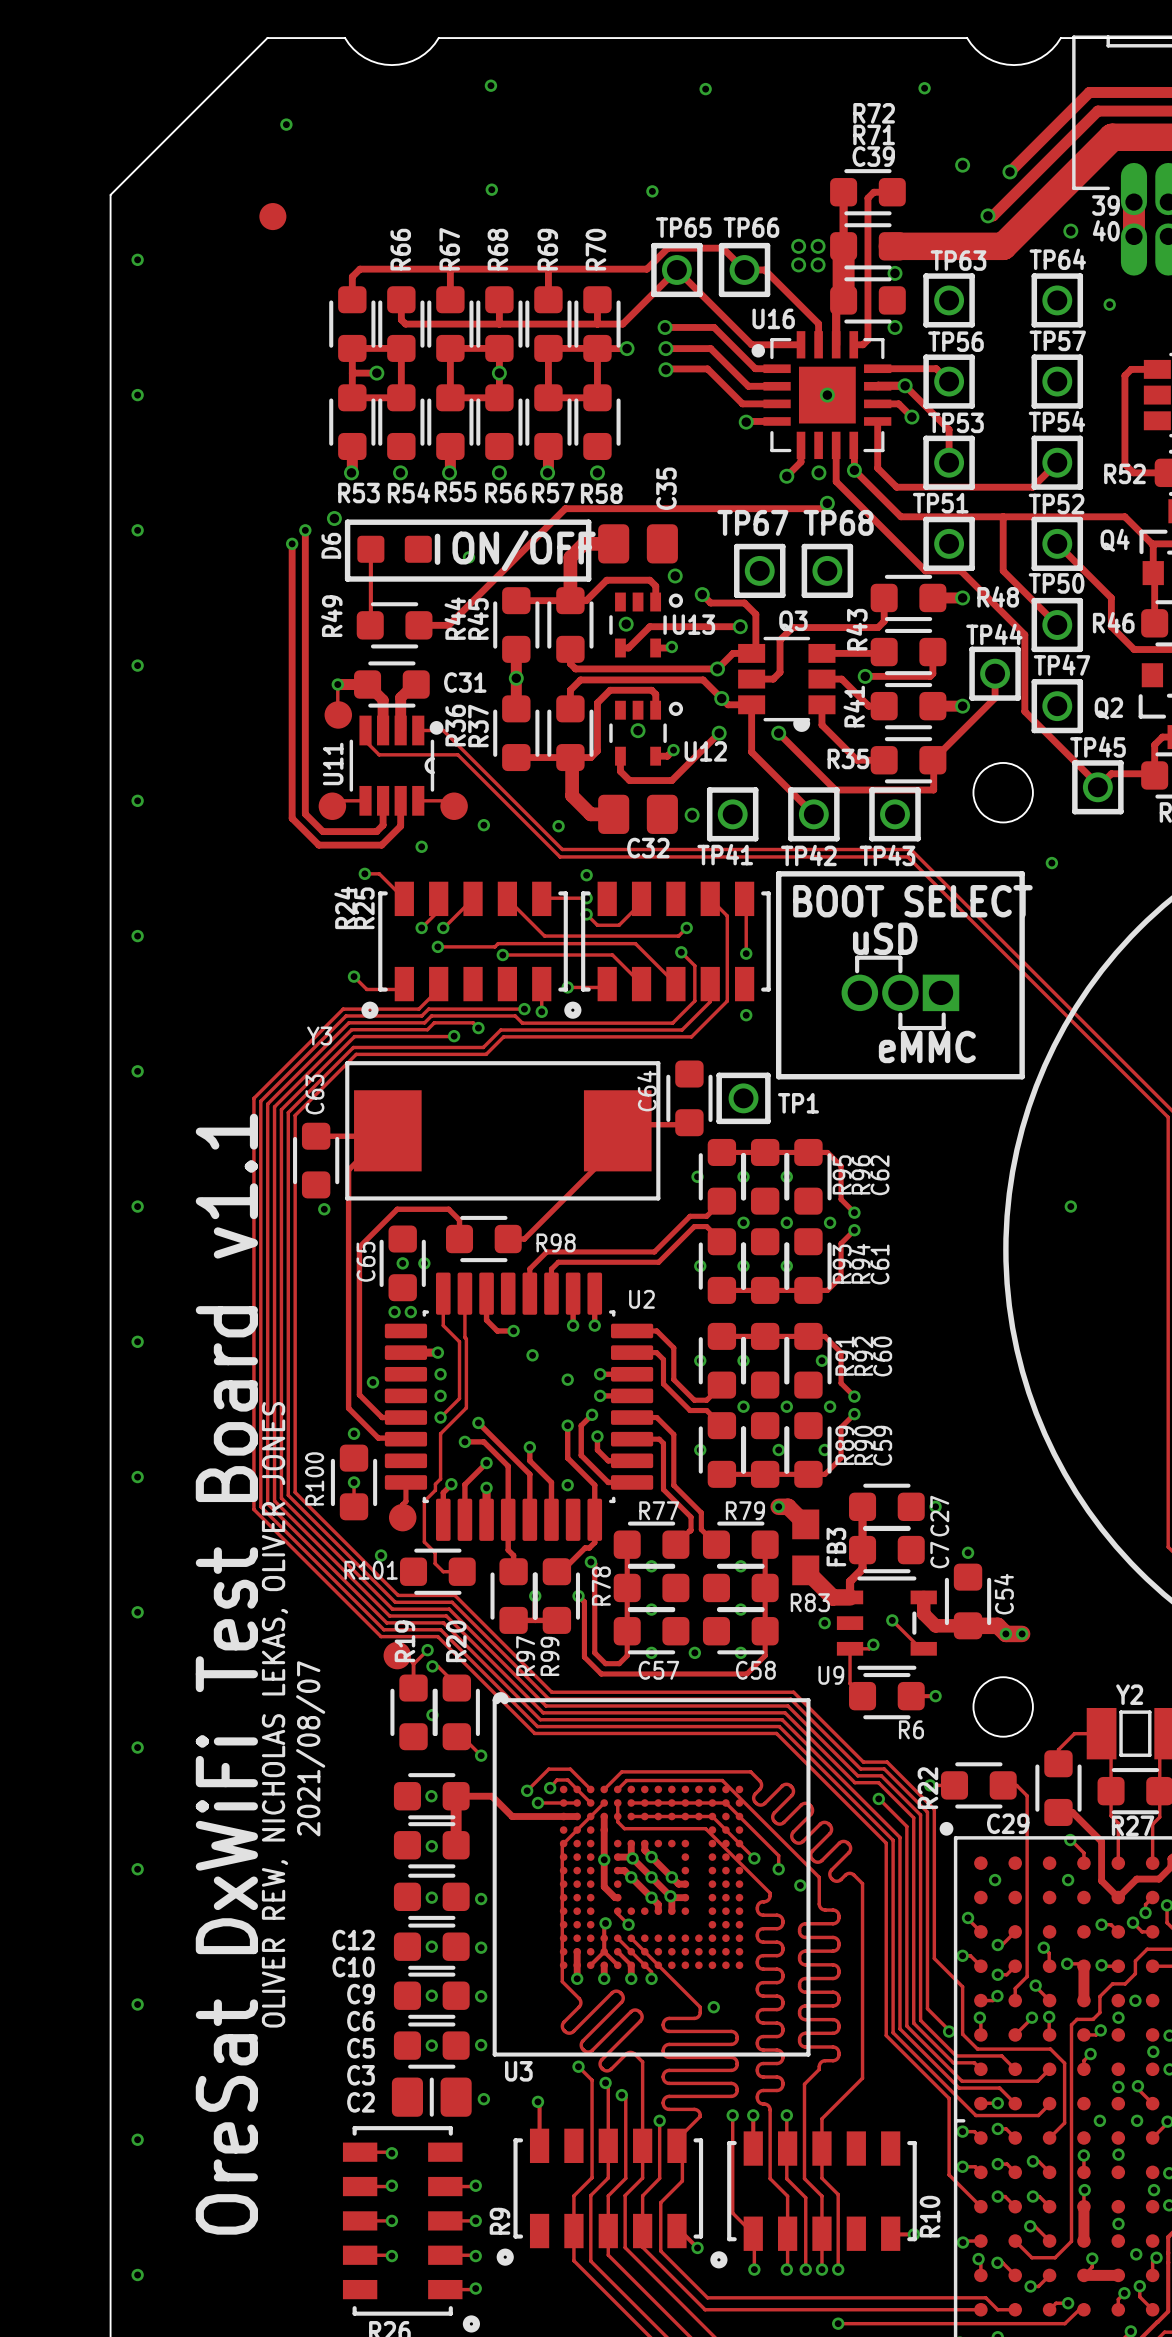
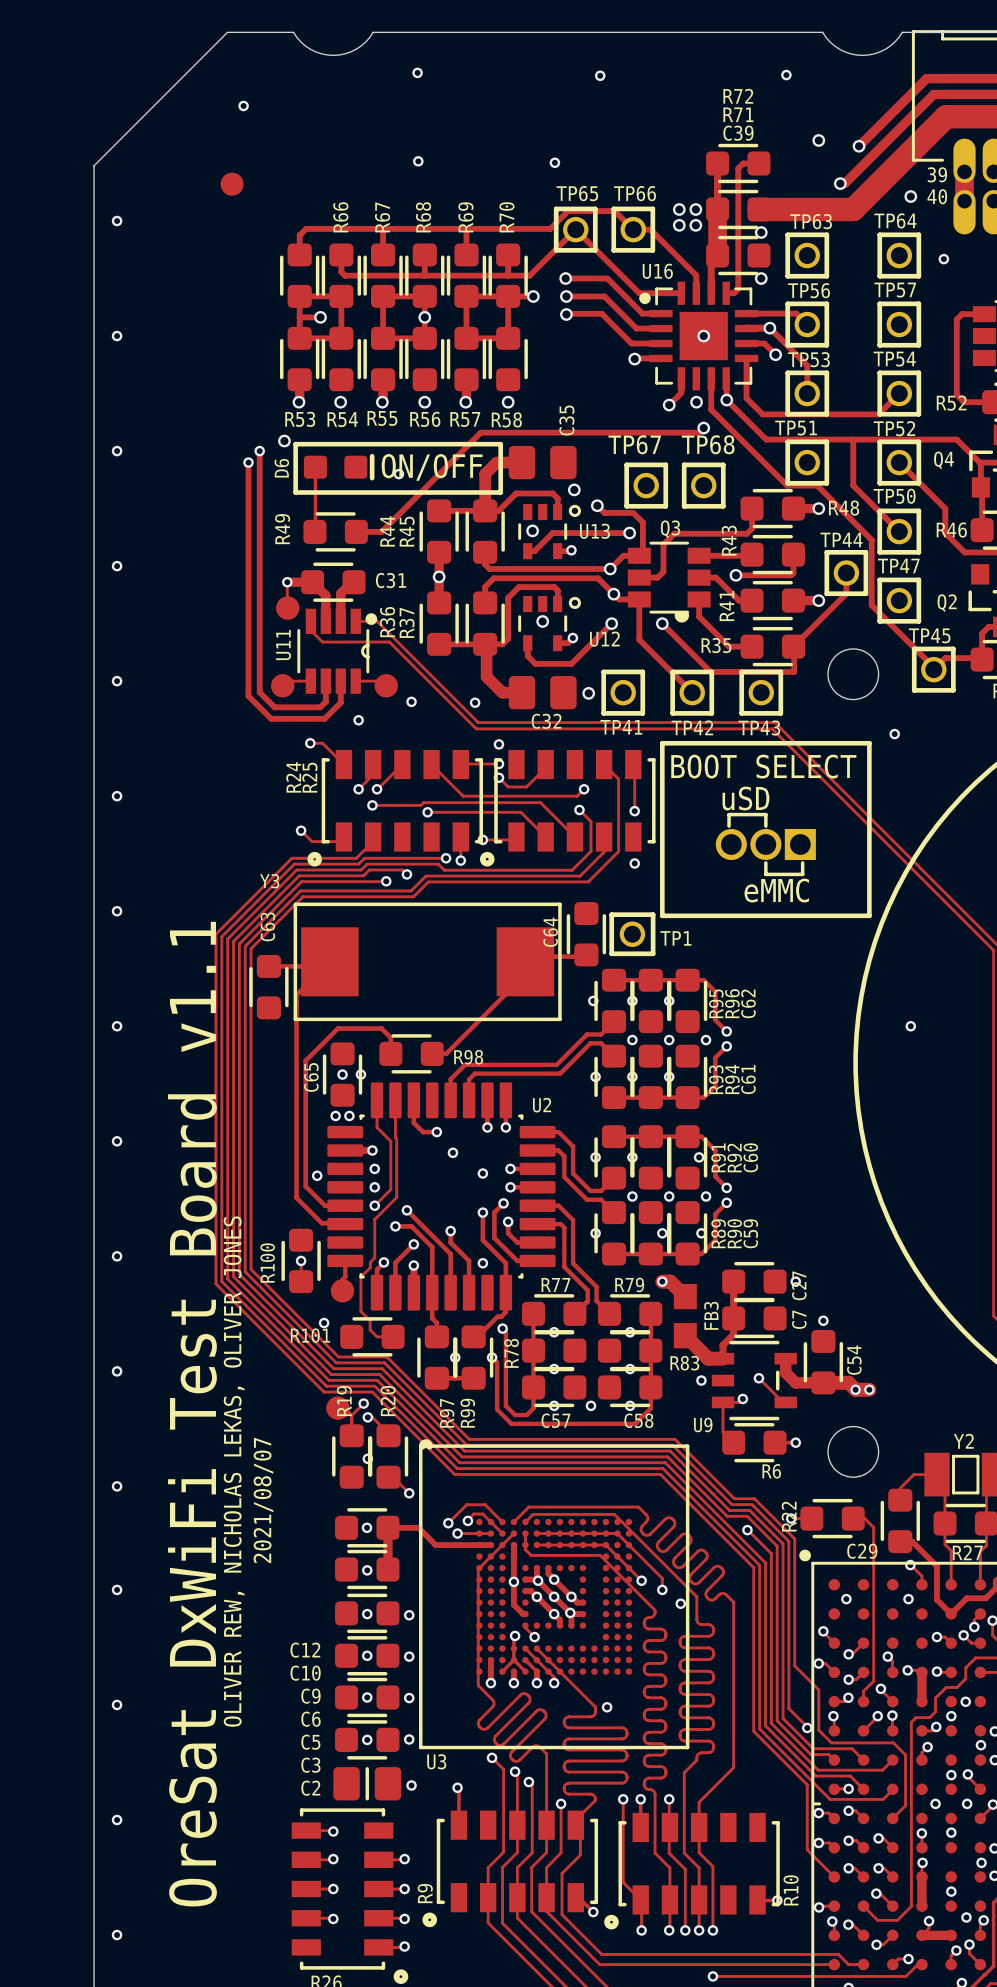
via: (324, 1209) -> none
via: (354, 1433) -> none

